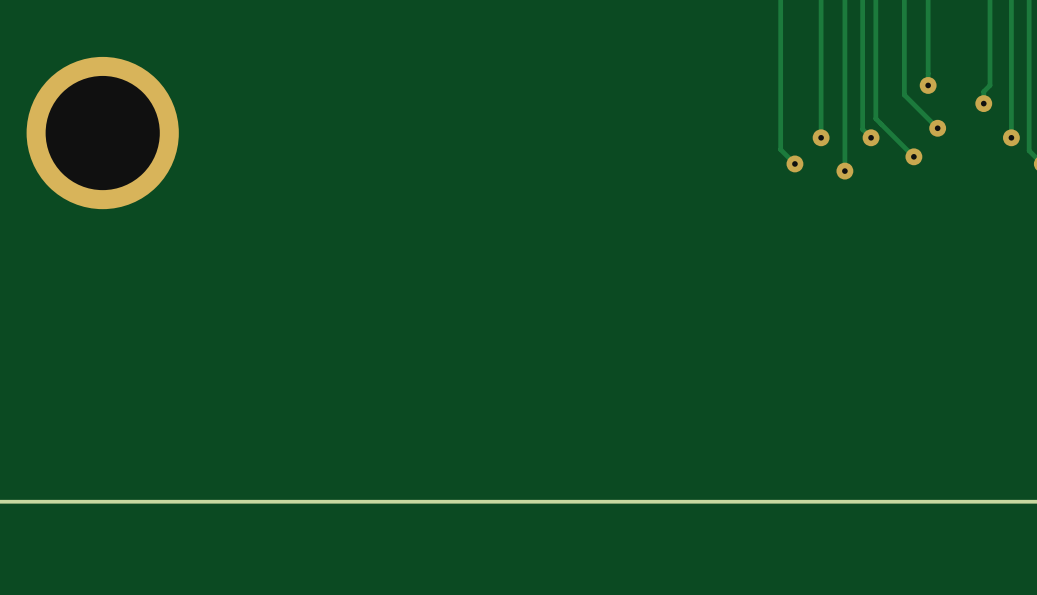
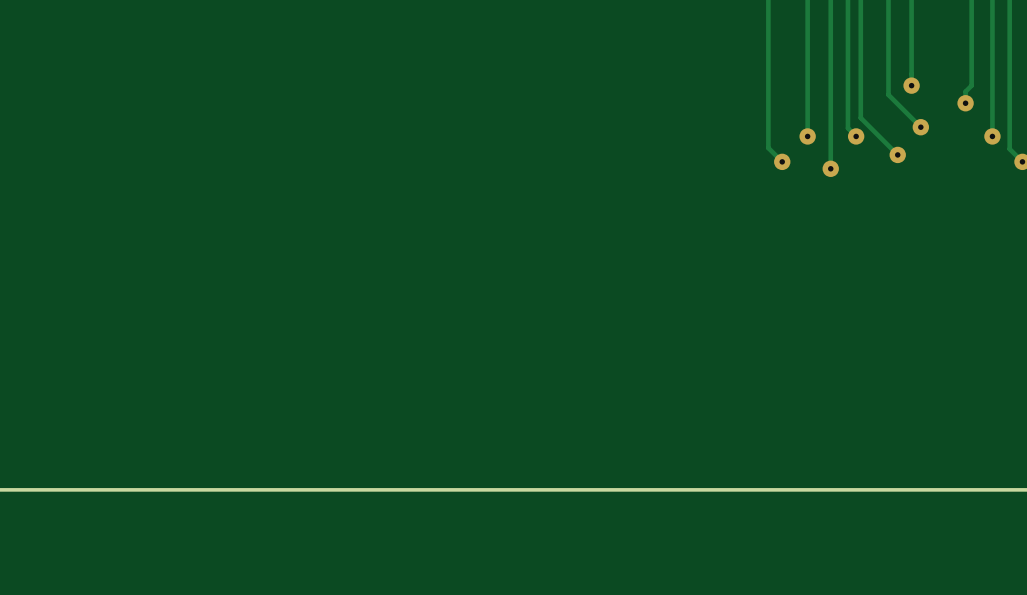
part: (102, 133) -> none

